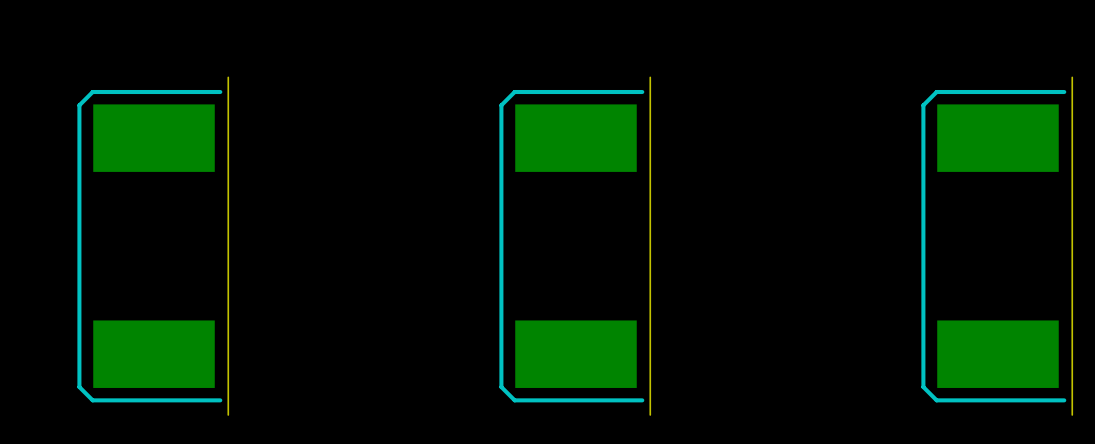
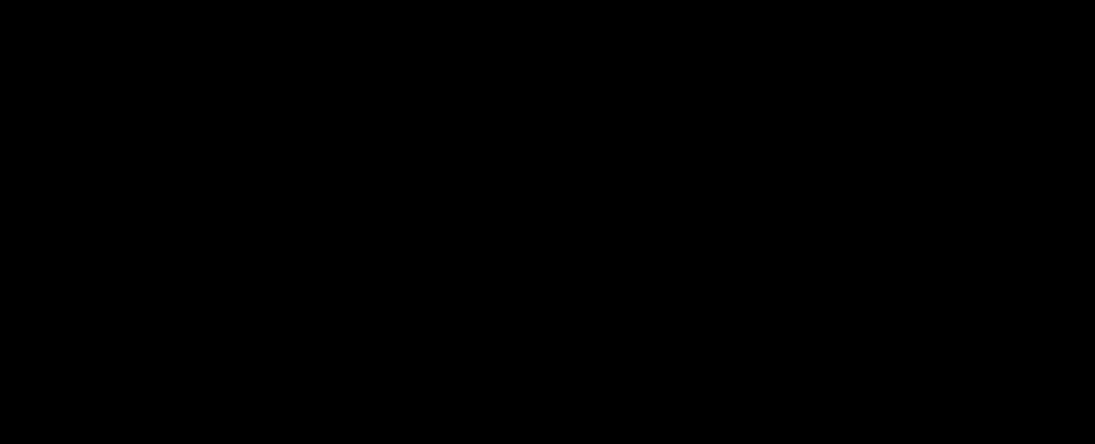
part: (152, 246) -> none
part: (574, 246) -> none
part: (996, 246) -> none

